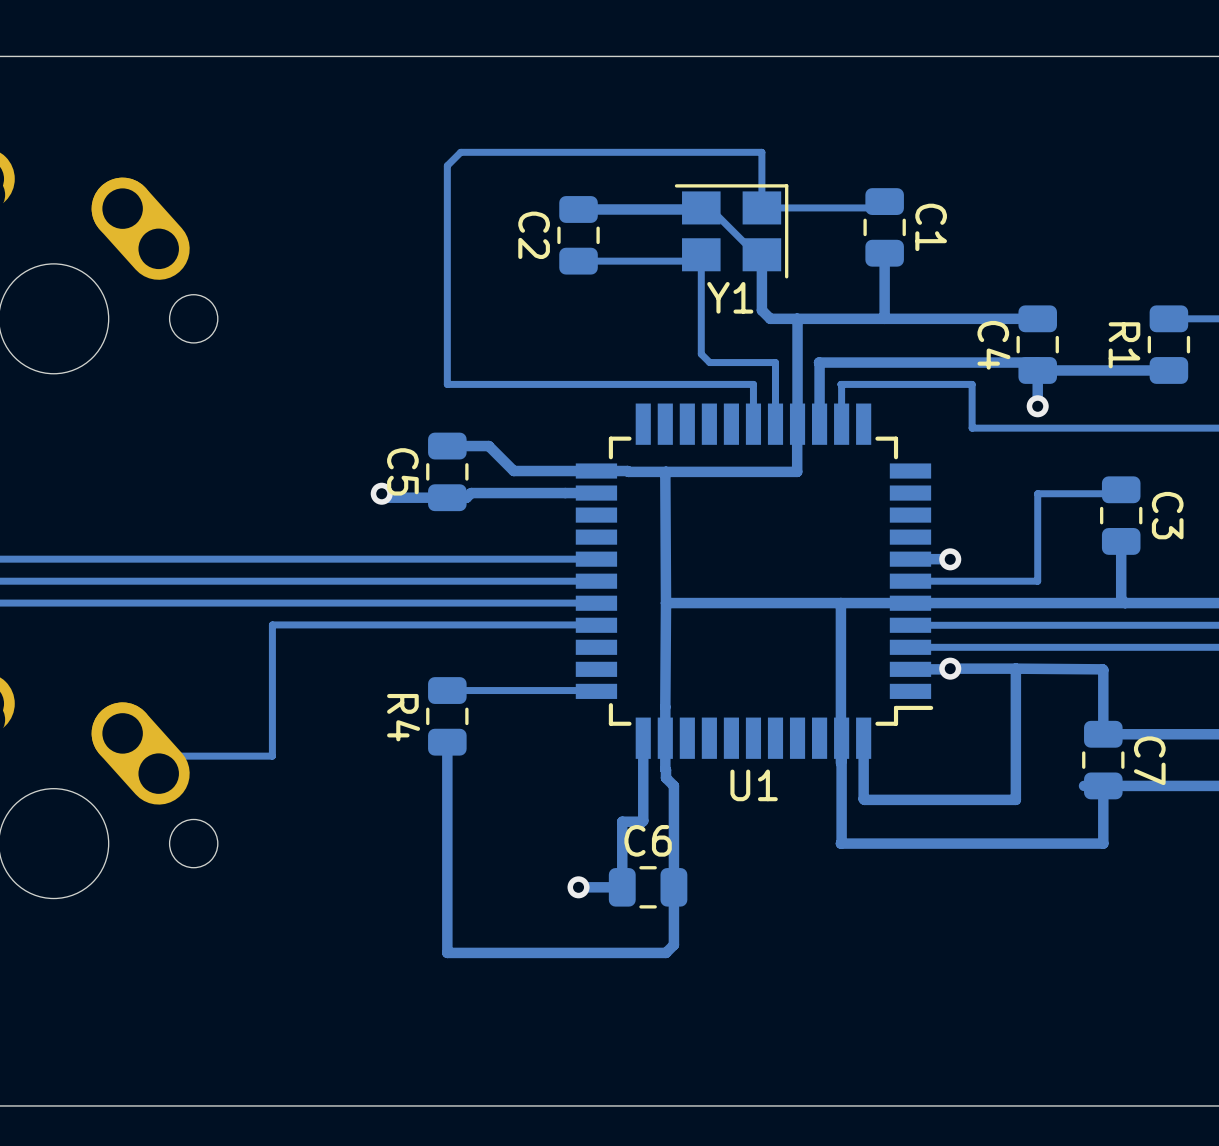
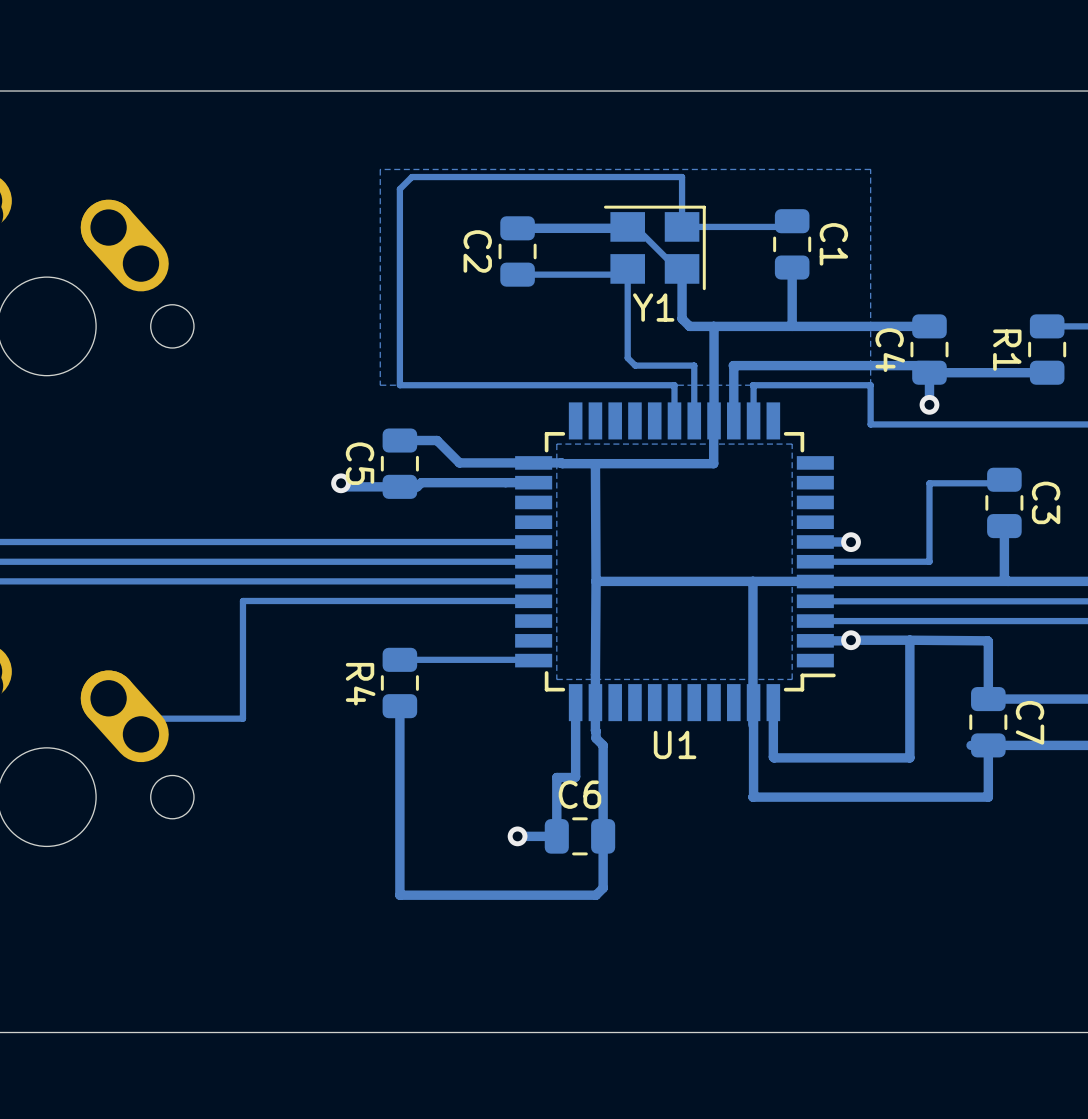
zone outline: none -> (870, 169) (870, 385) (380, 385) (380, 169) (870, 169)
zone outline: none -> (792, 444) (792, 679) (556, 679) (556, 444) (792, 444)

